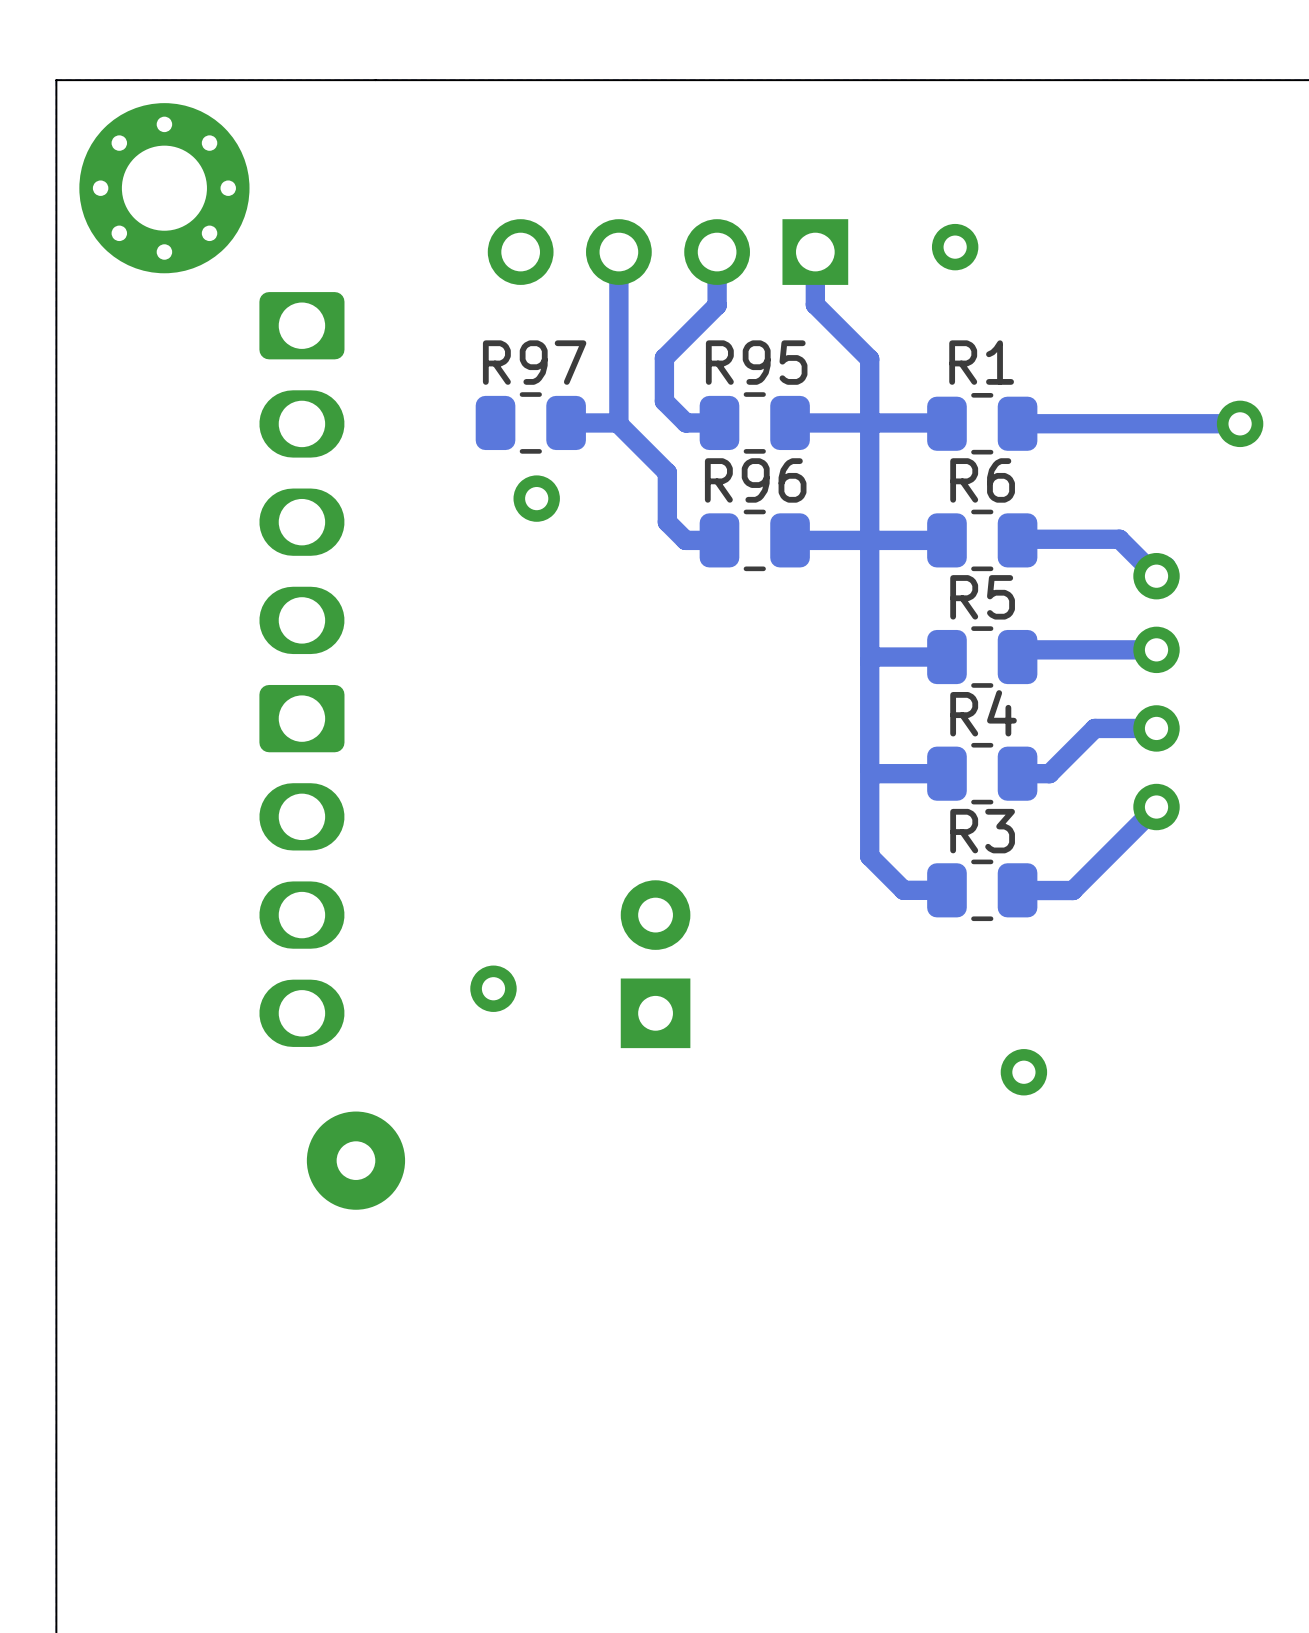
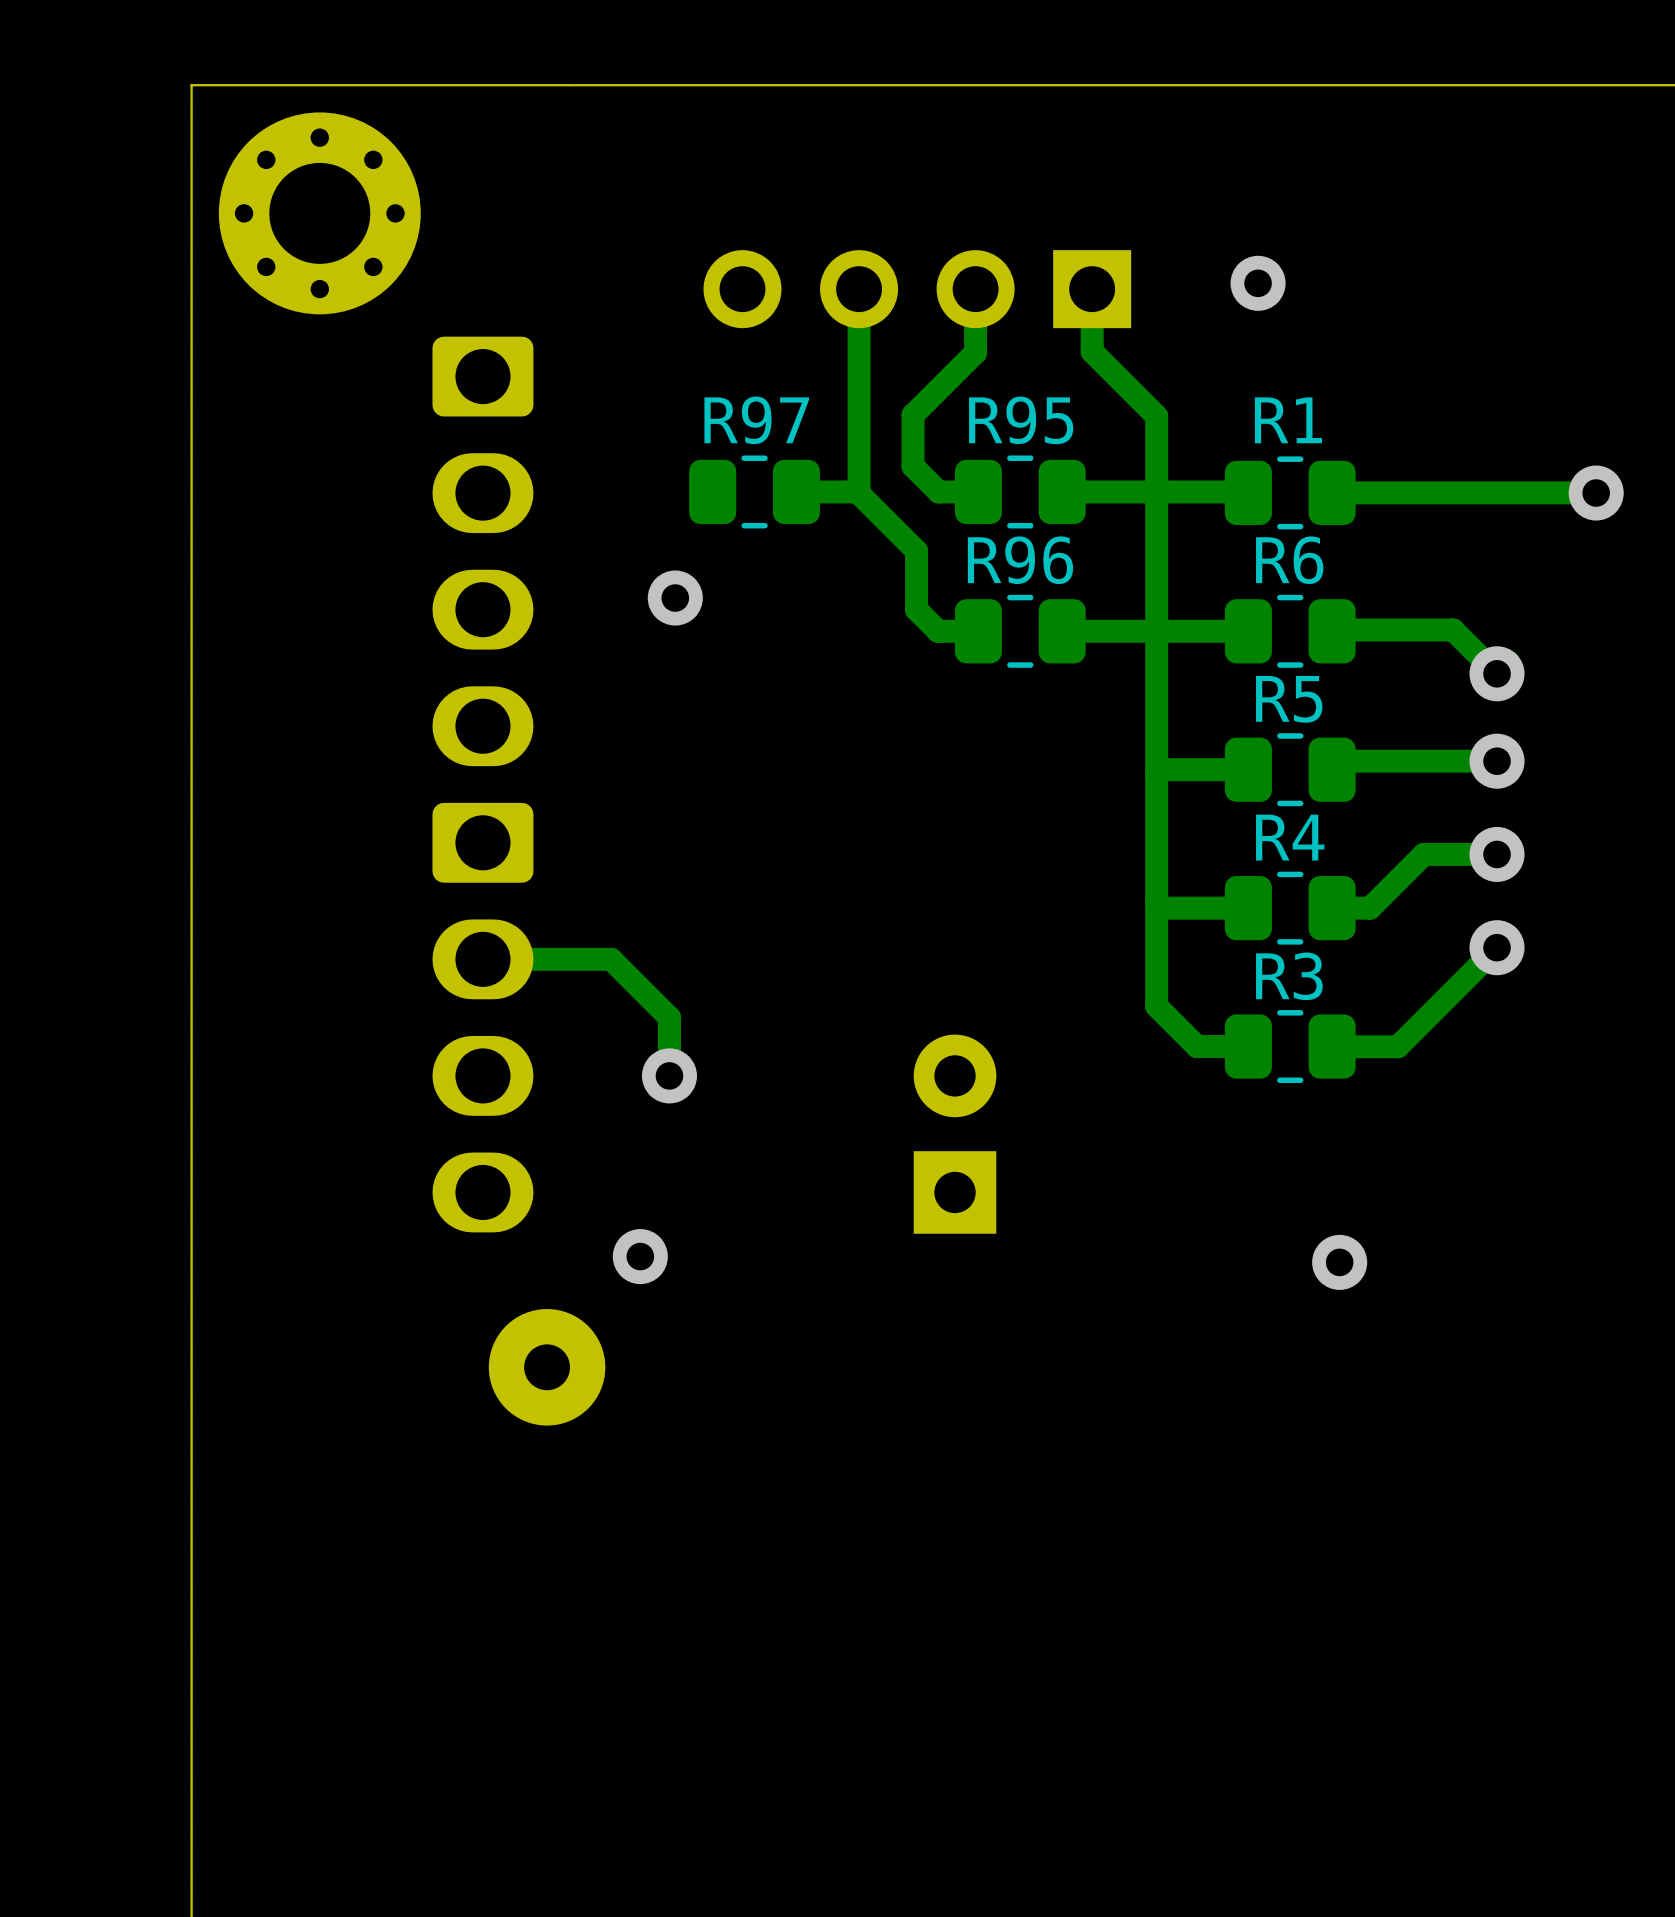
via position: (536, 498) -> (675, 598)
track: none -> (482, 959) (611, 959) (669, 1017) (669, 1075)
via: none -> (669, 1075)
part position: (655, 964) -> (955, 1134)
via: (493, 988) -> none
via: none -> (640, 1256)

